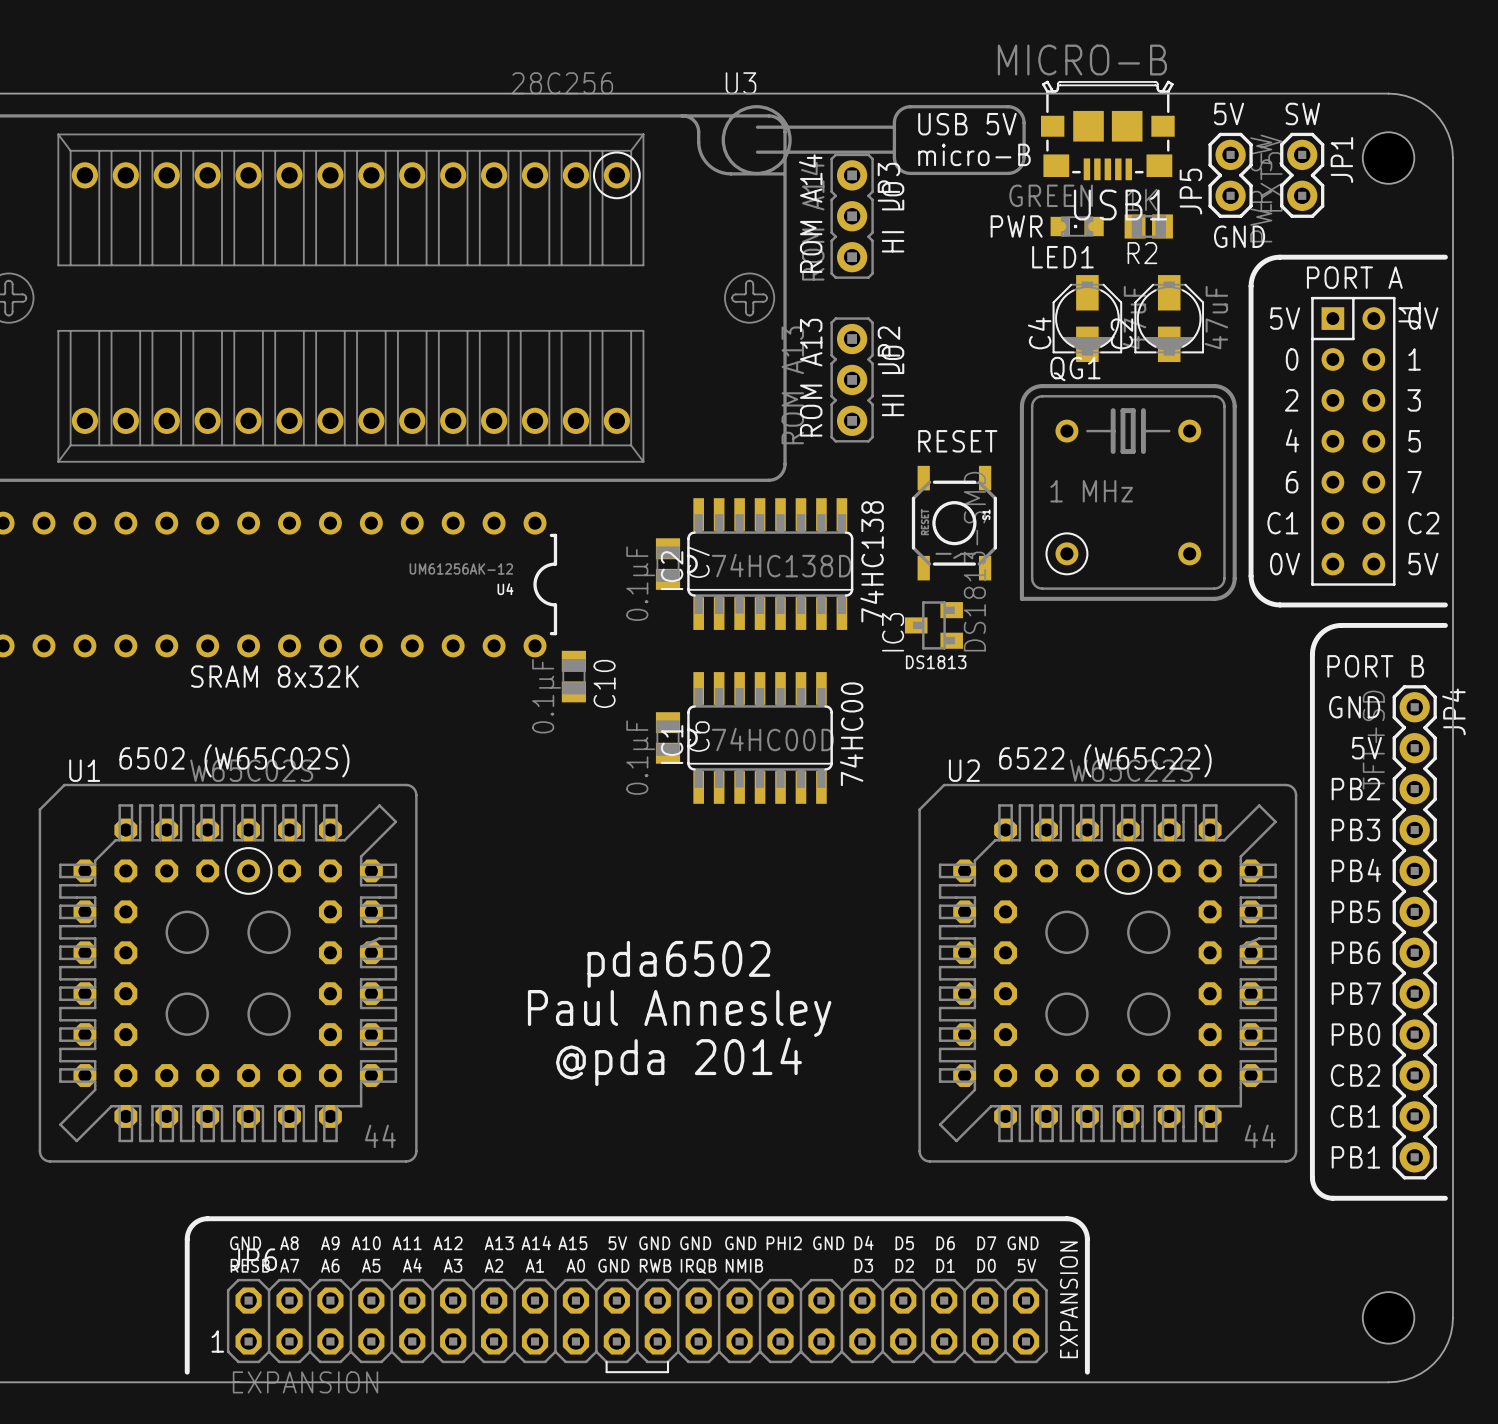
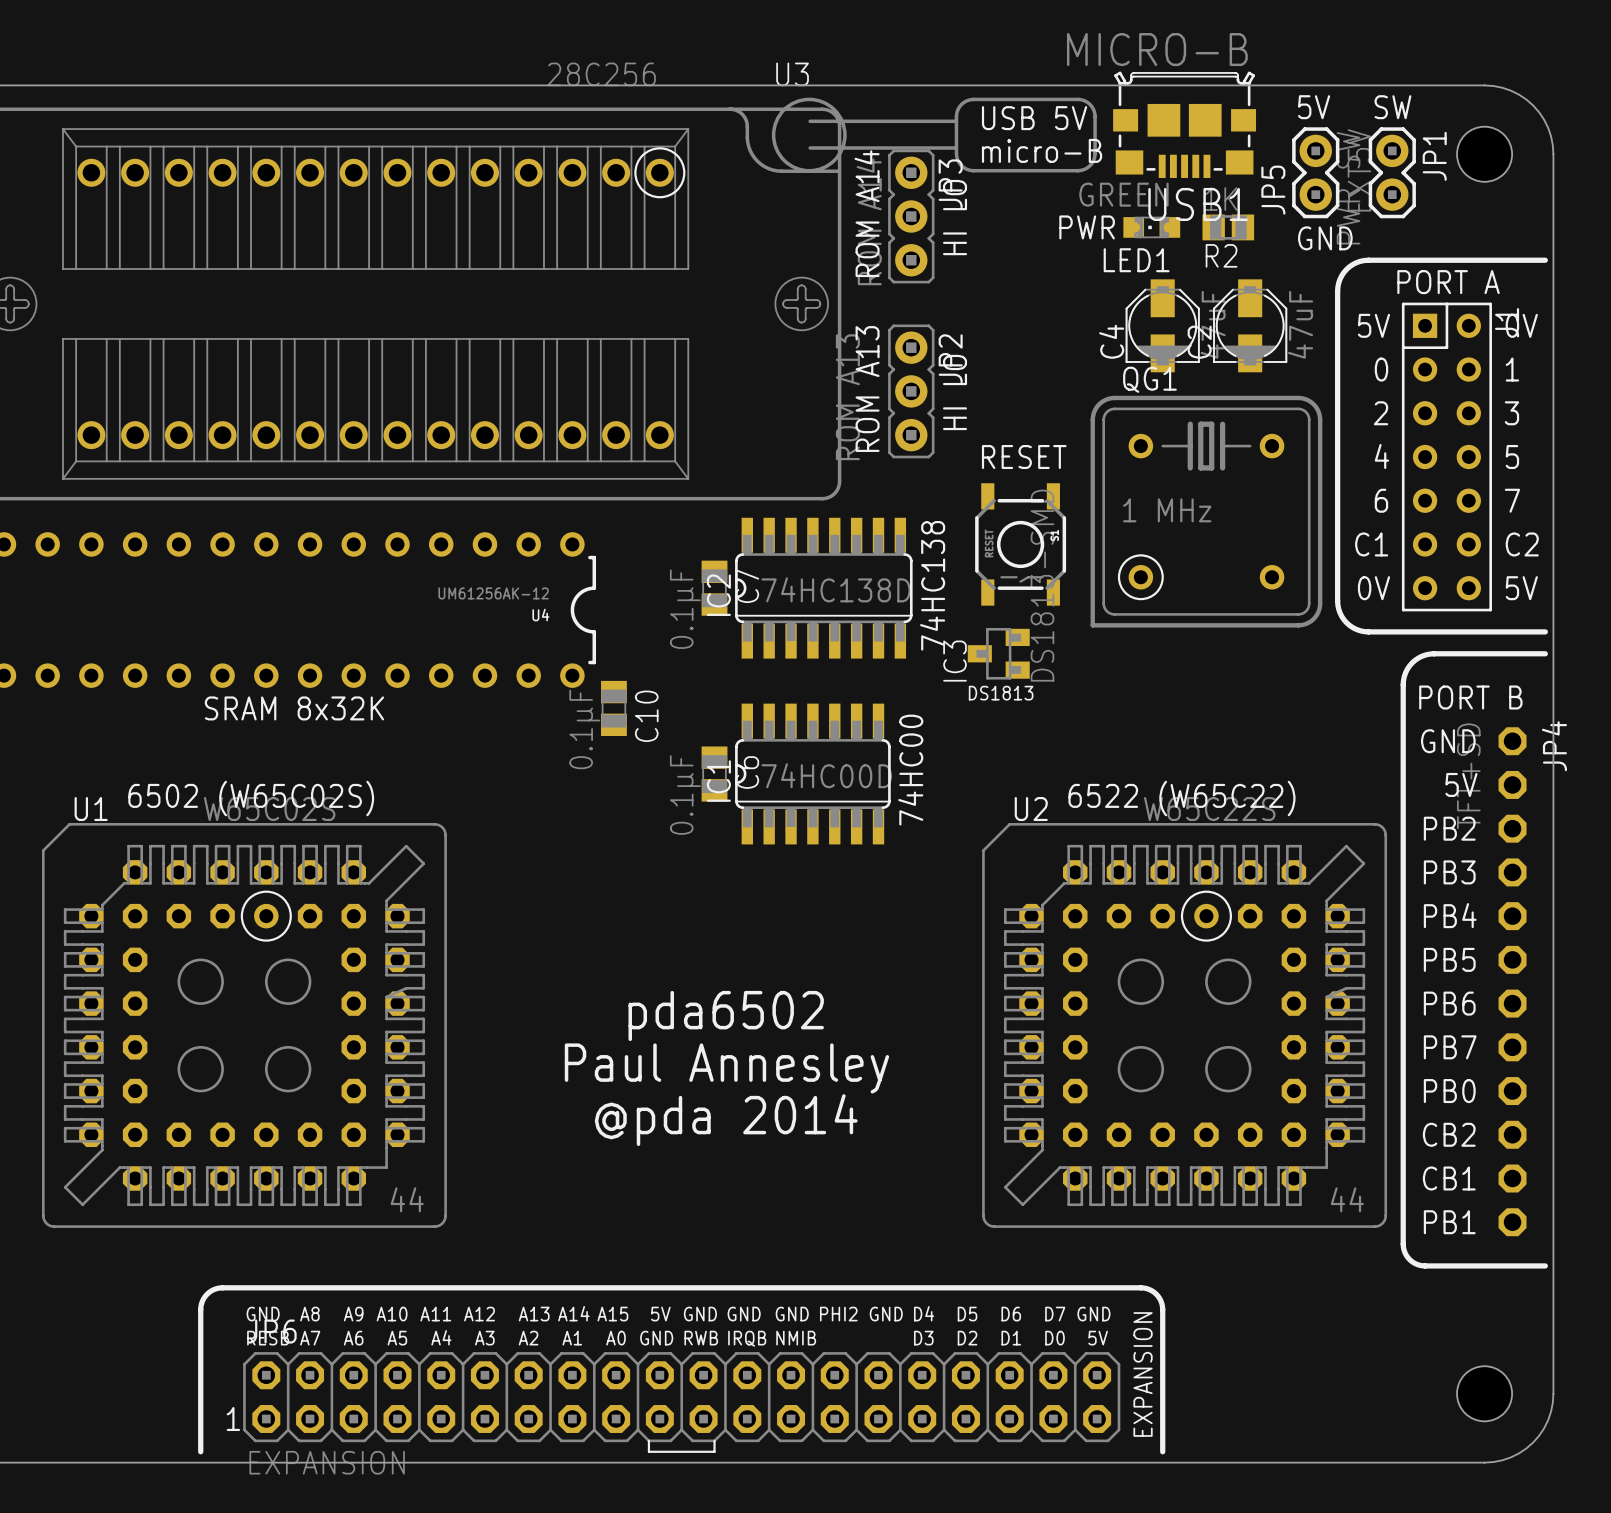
JP4 footprint: [1392, 685, 1437, 1180] -> [1498, 727, 1527, 1237]

